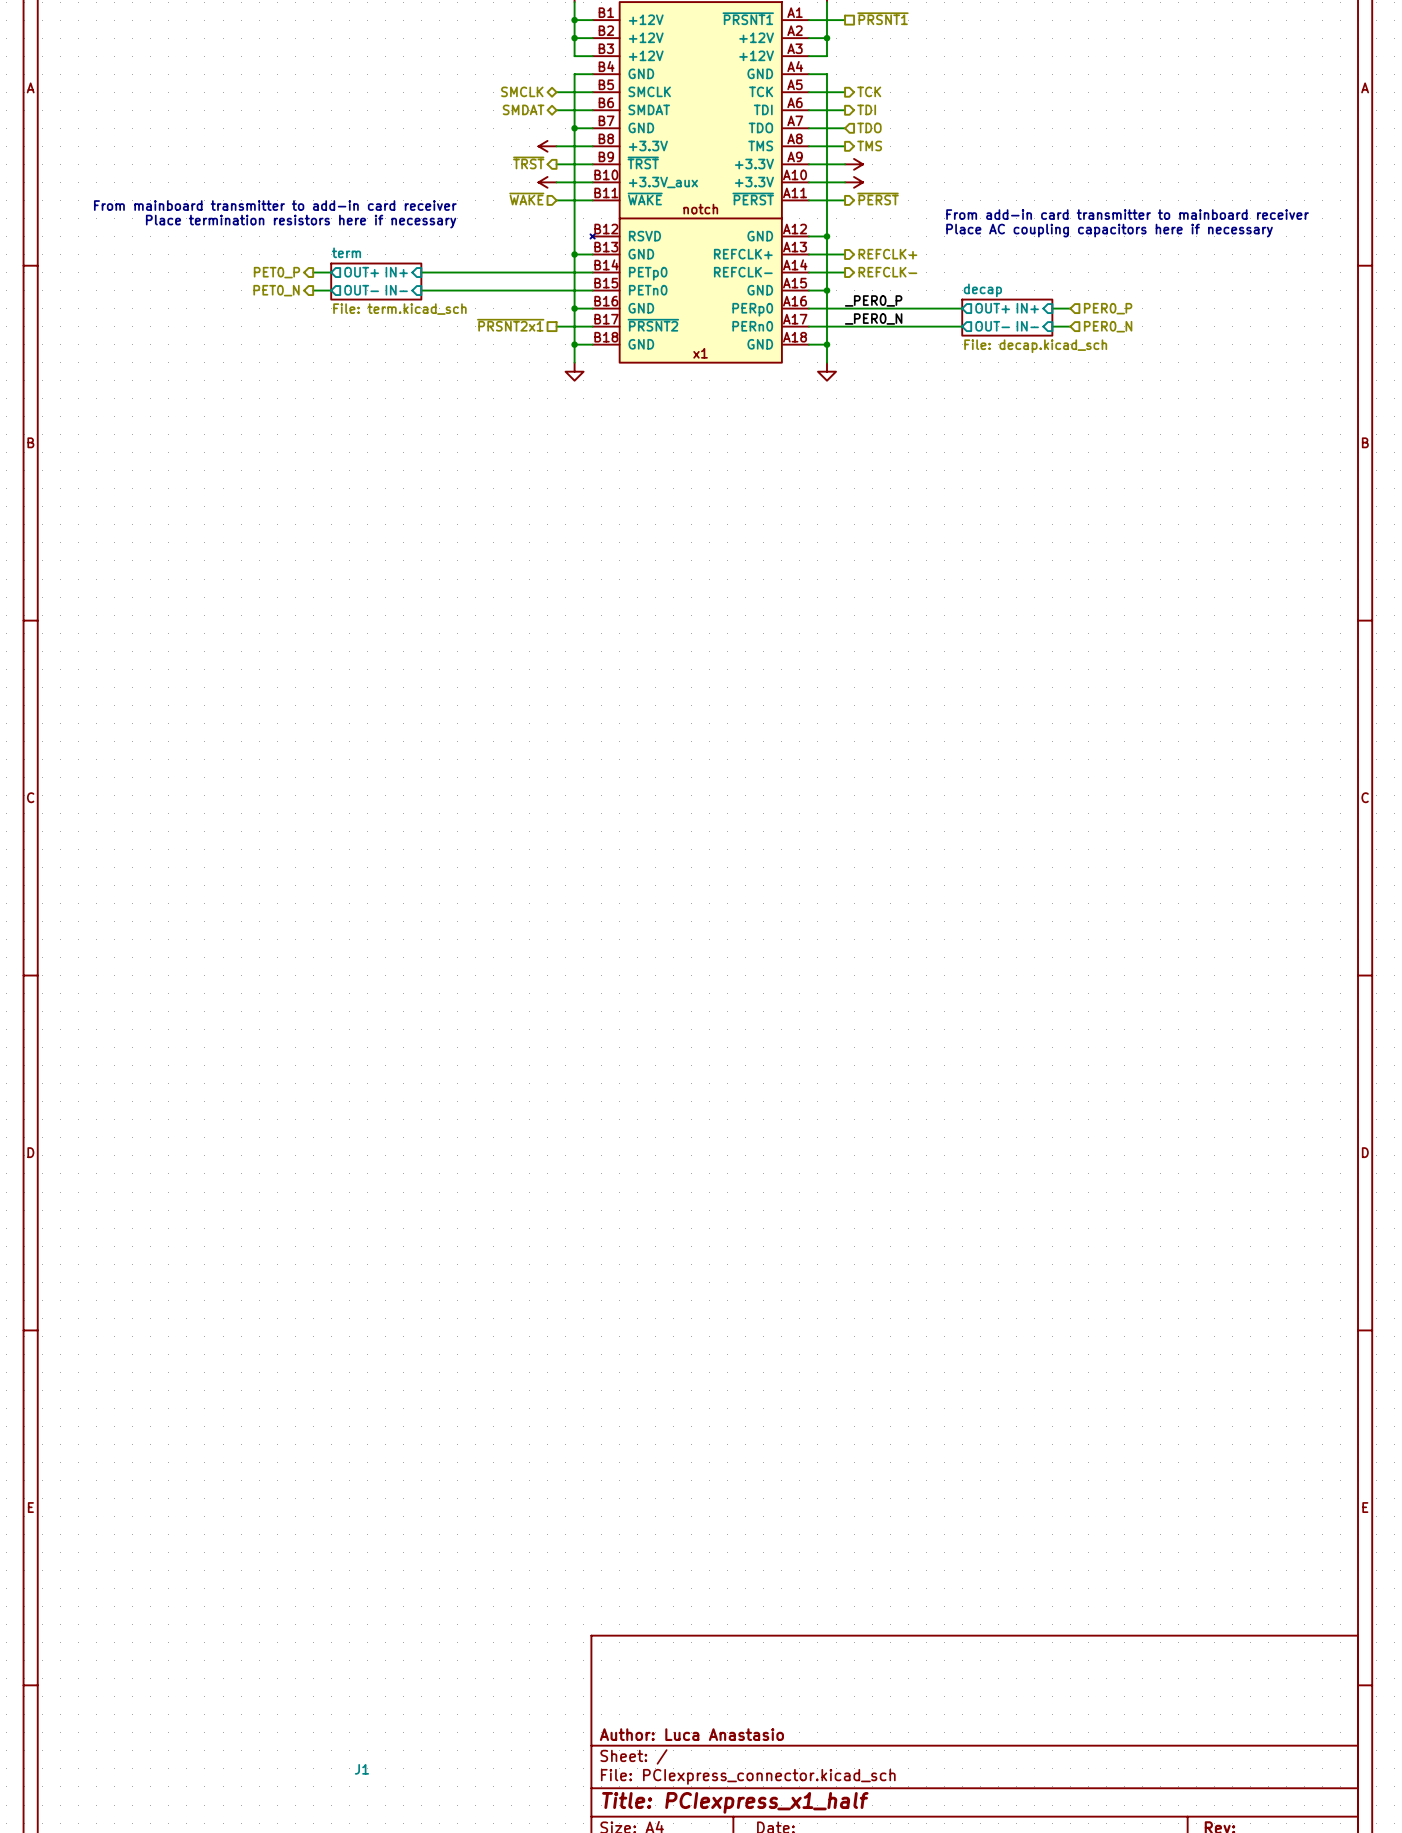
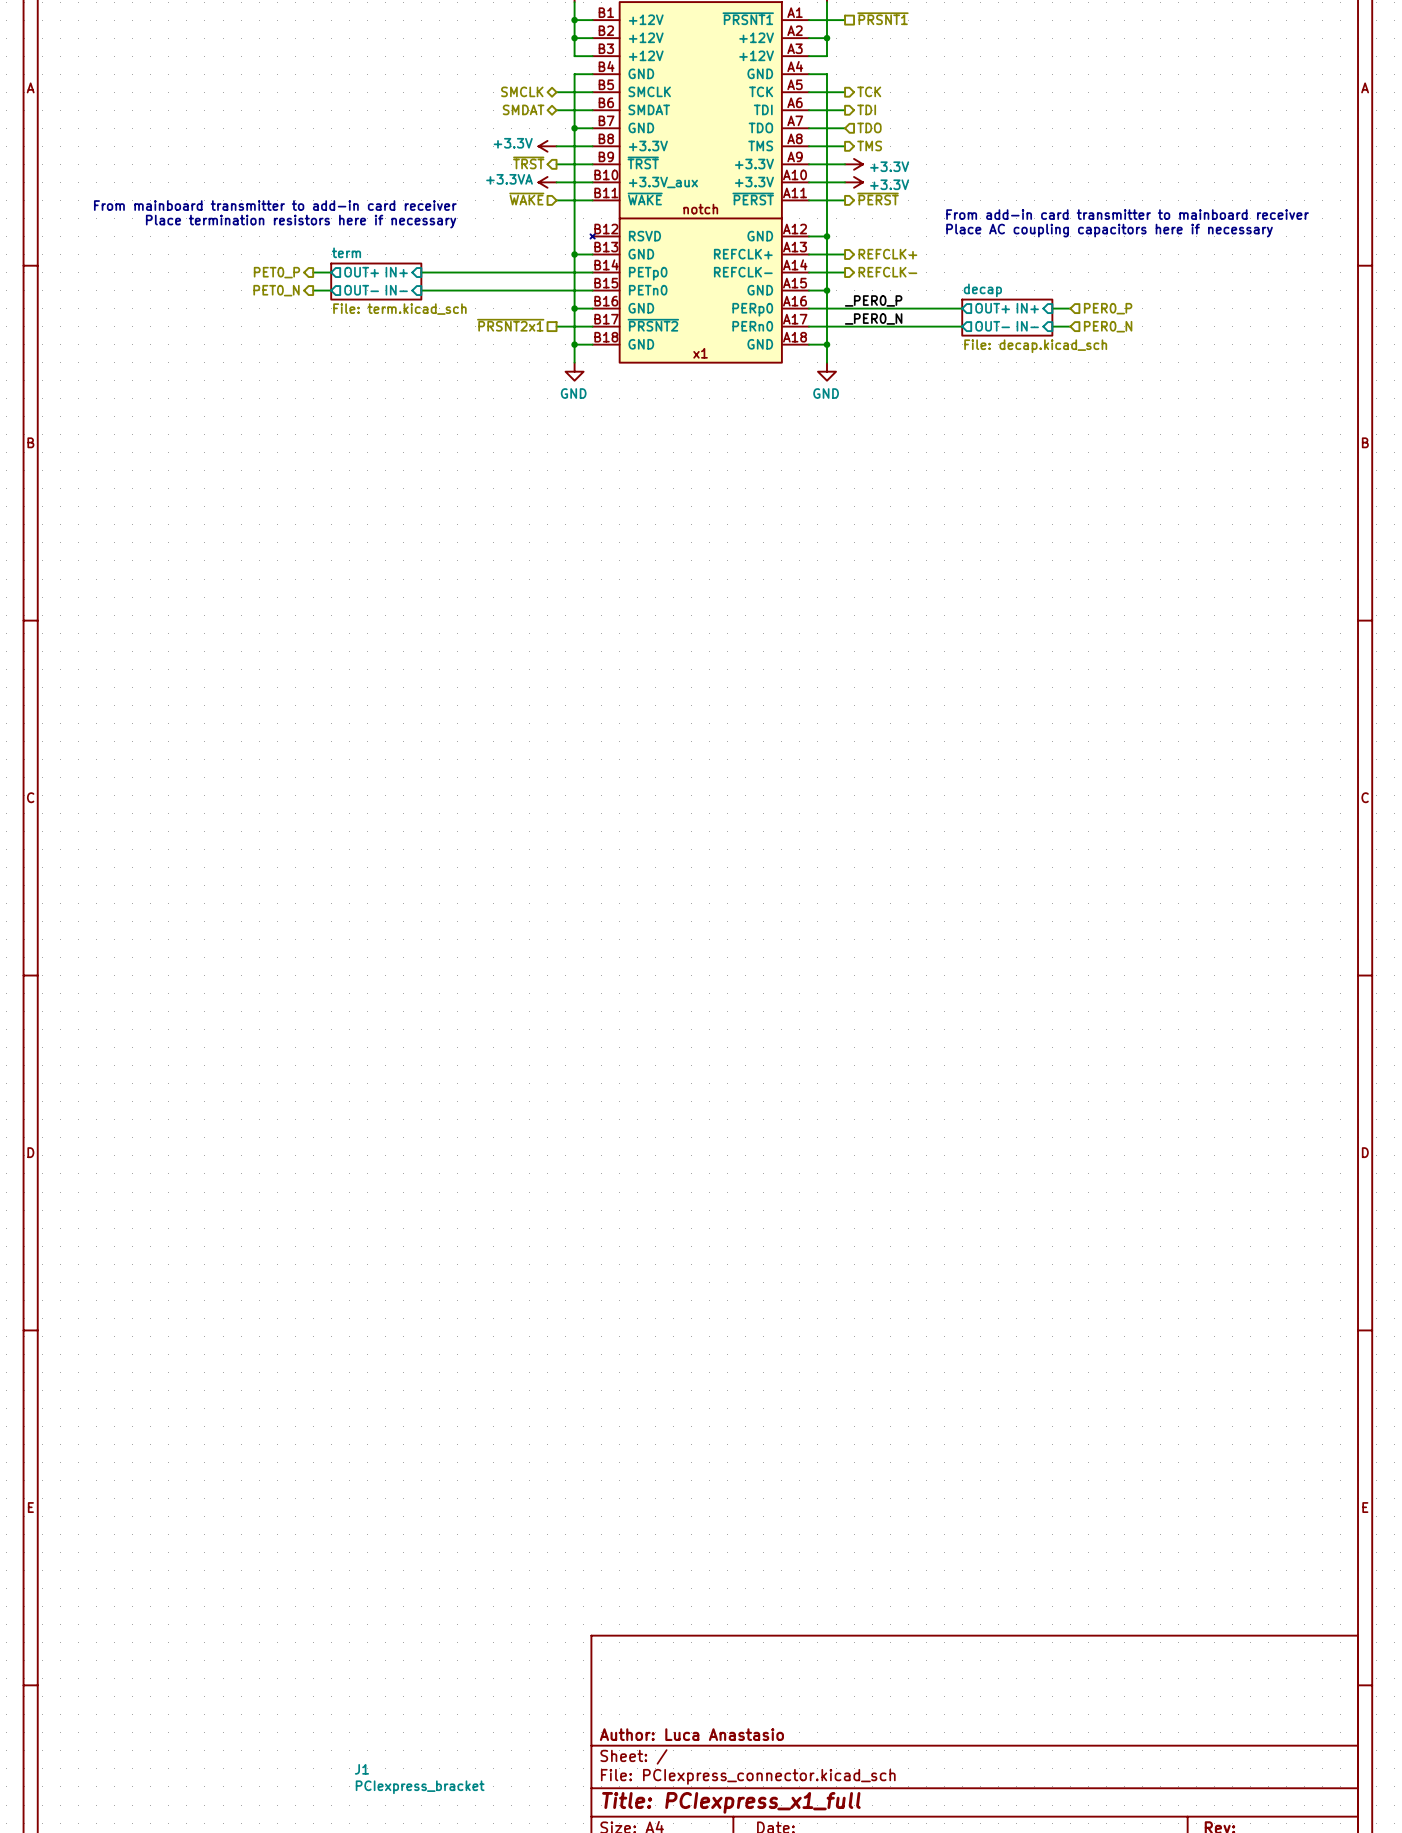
power symbol text: none -> +3.3V (513, 143)
power symbol text: none -> +3.3V (889, 166)
power symbol text: none -> +3.3VA (509, 179)
power symbol text: none -> +3.3V (889, 184)
power symbol text: none -> GND (573, 393)
power symbol text: none -> GND (826, 393)
J1 position: (361, 1769) -> (419, 1779)
J1 value: none -> PCIexpress_bracket (420, 1787)
title block: Title: PCIexpress_x1_half (735, 1802) -> Title: PCIexpress_x1_full (731, 1802)

